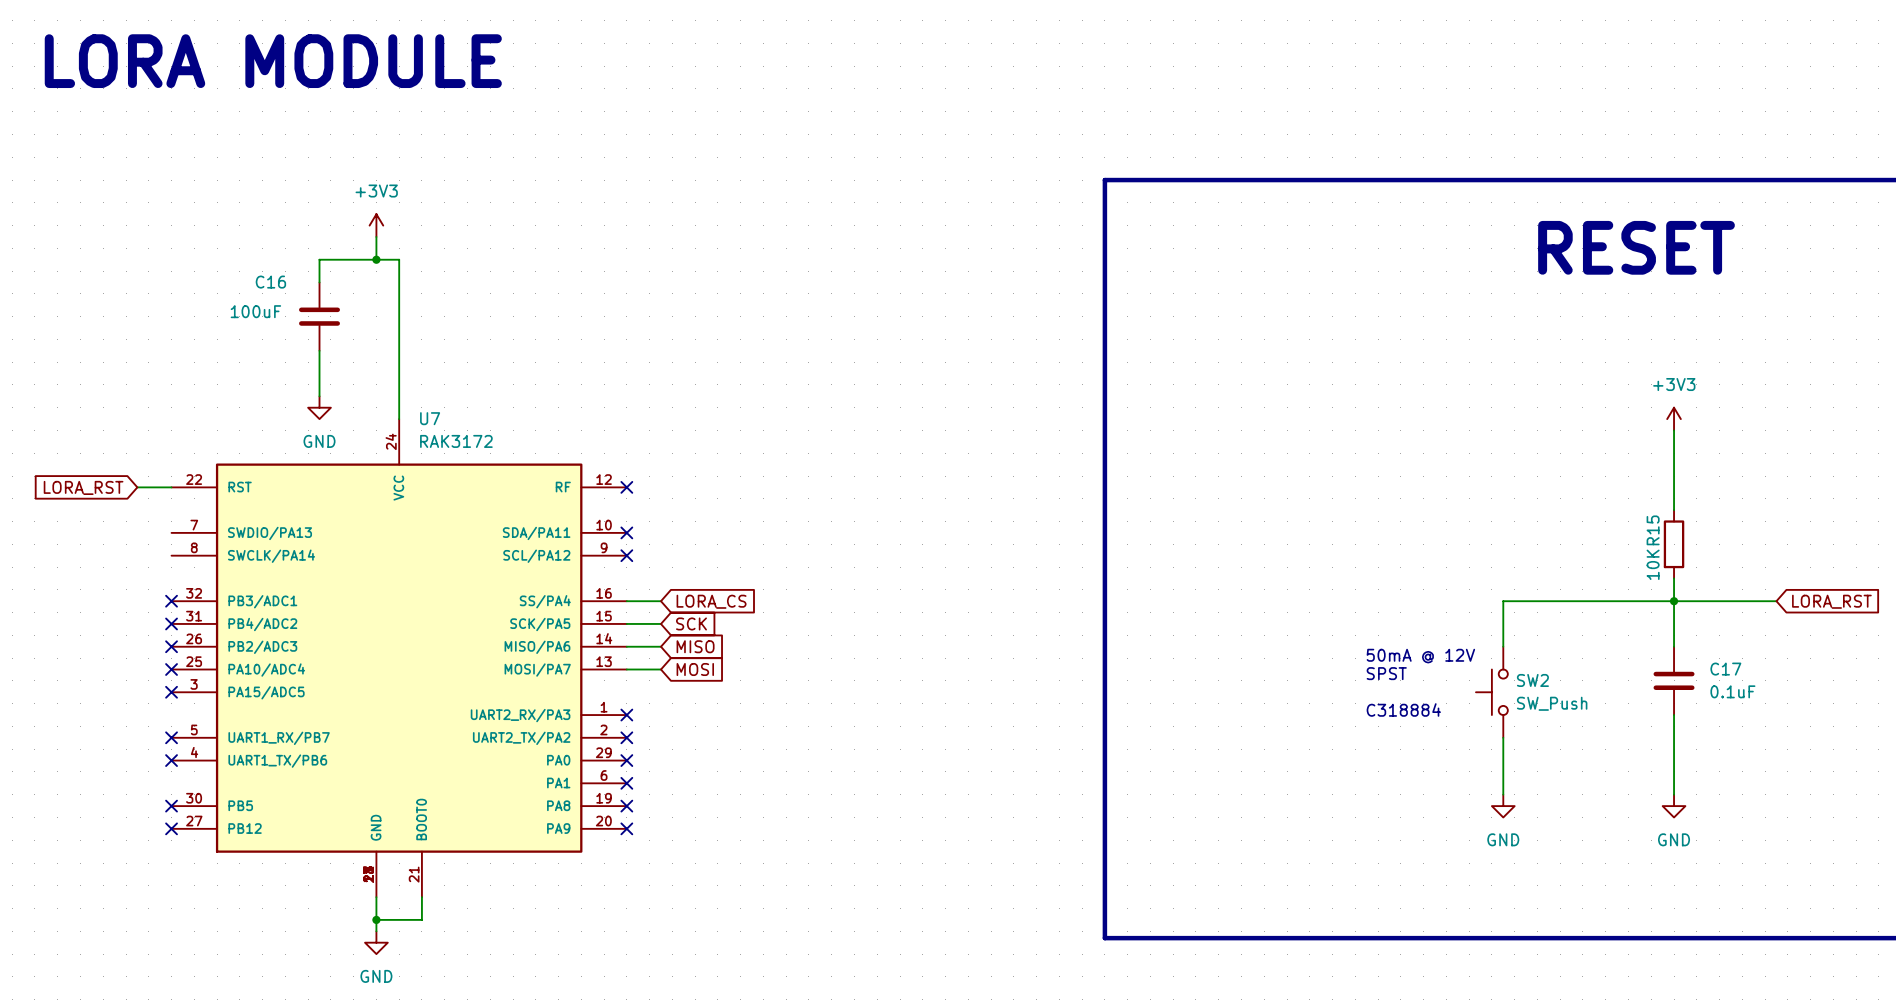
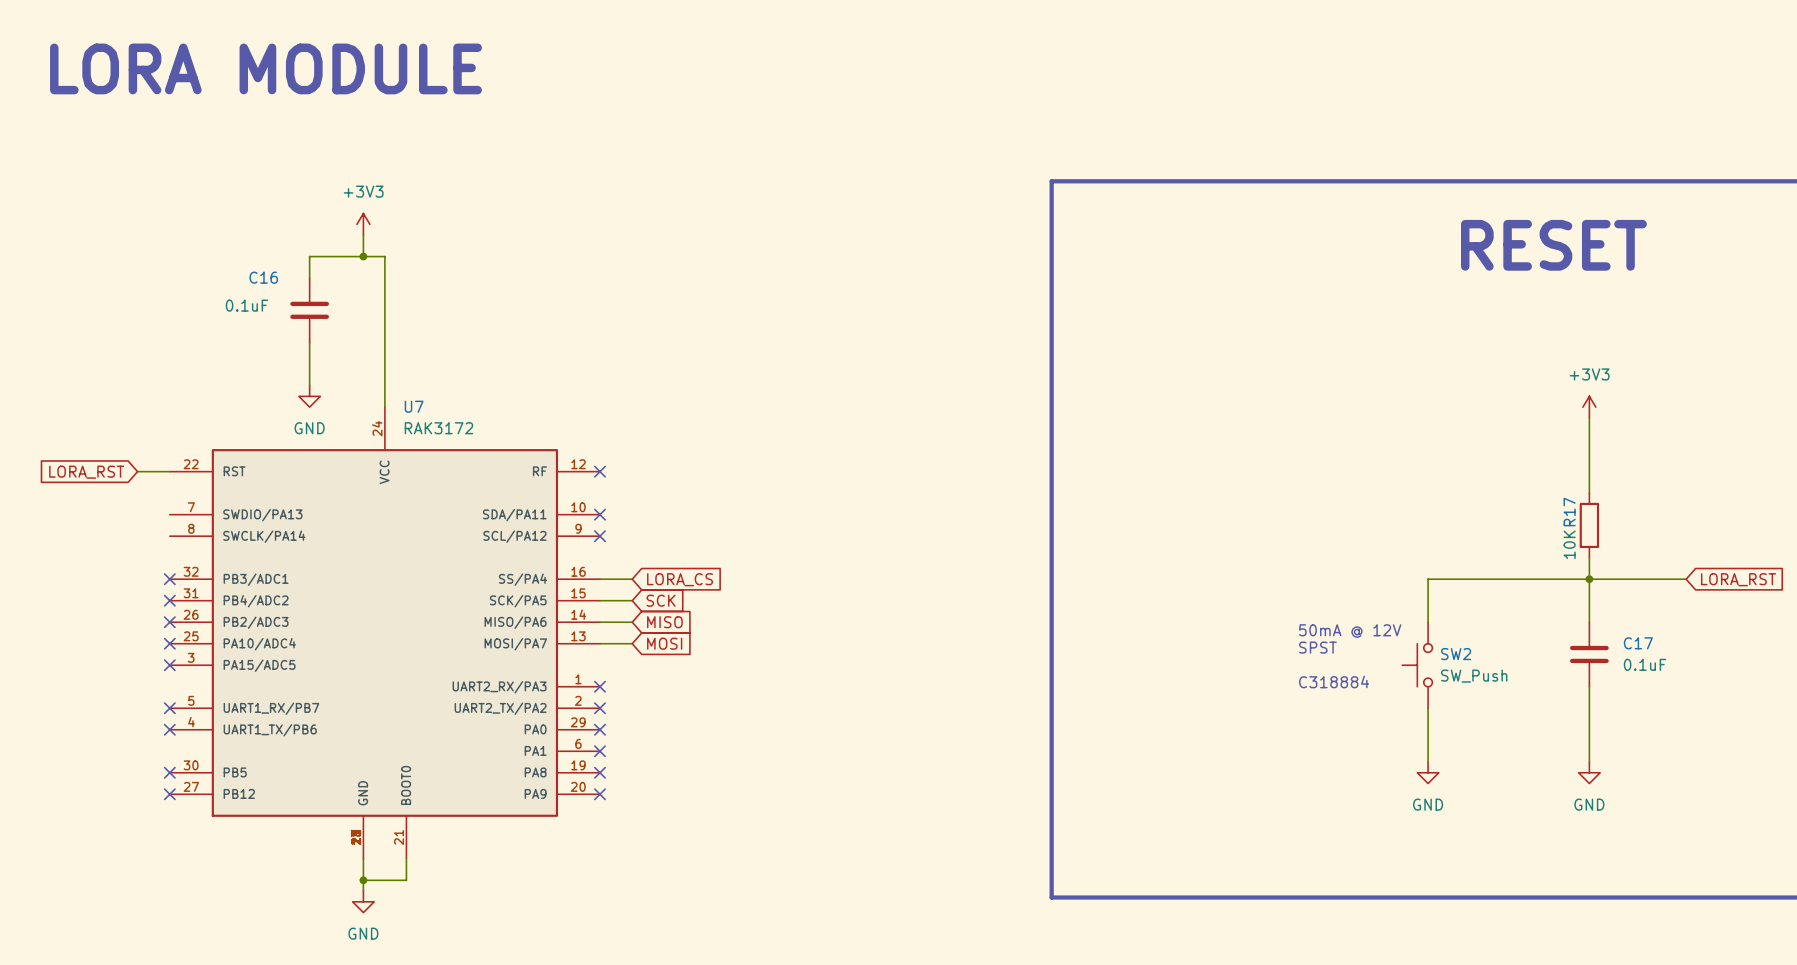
C16 value: 100uF (255, 311) -> 0.1uF (246, 305)
R15 name: R15 (1653, 530) -> R17 (1569, 512)

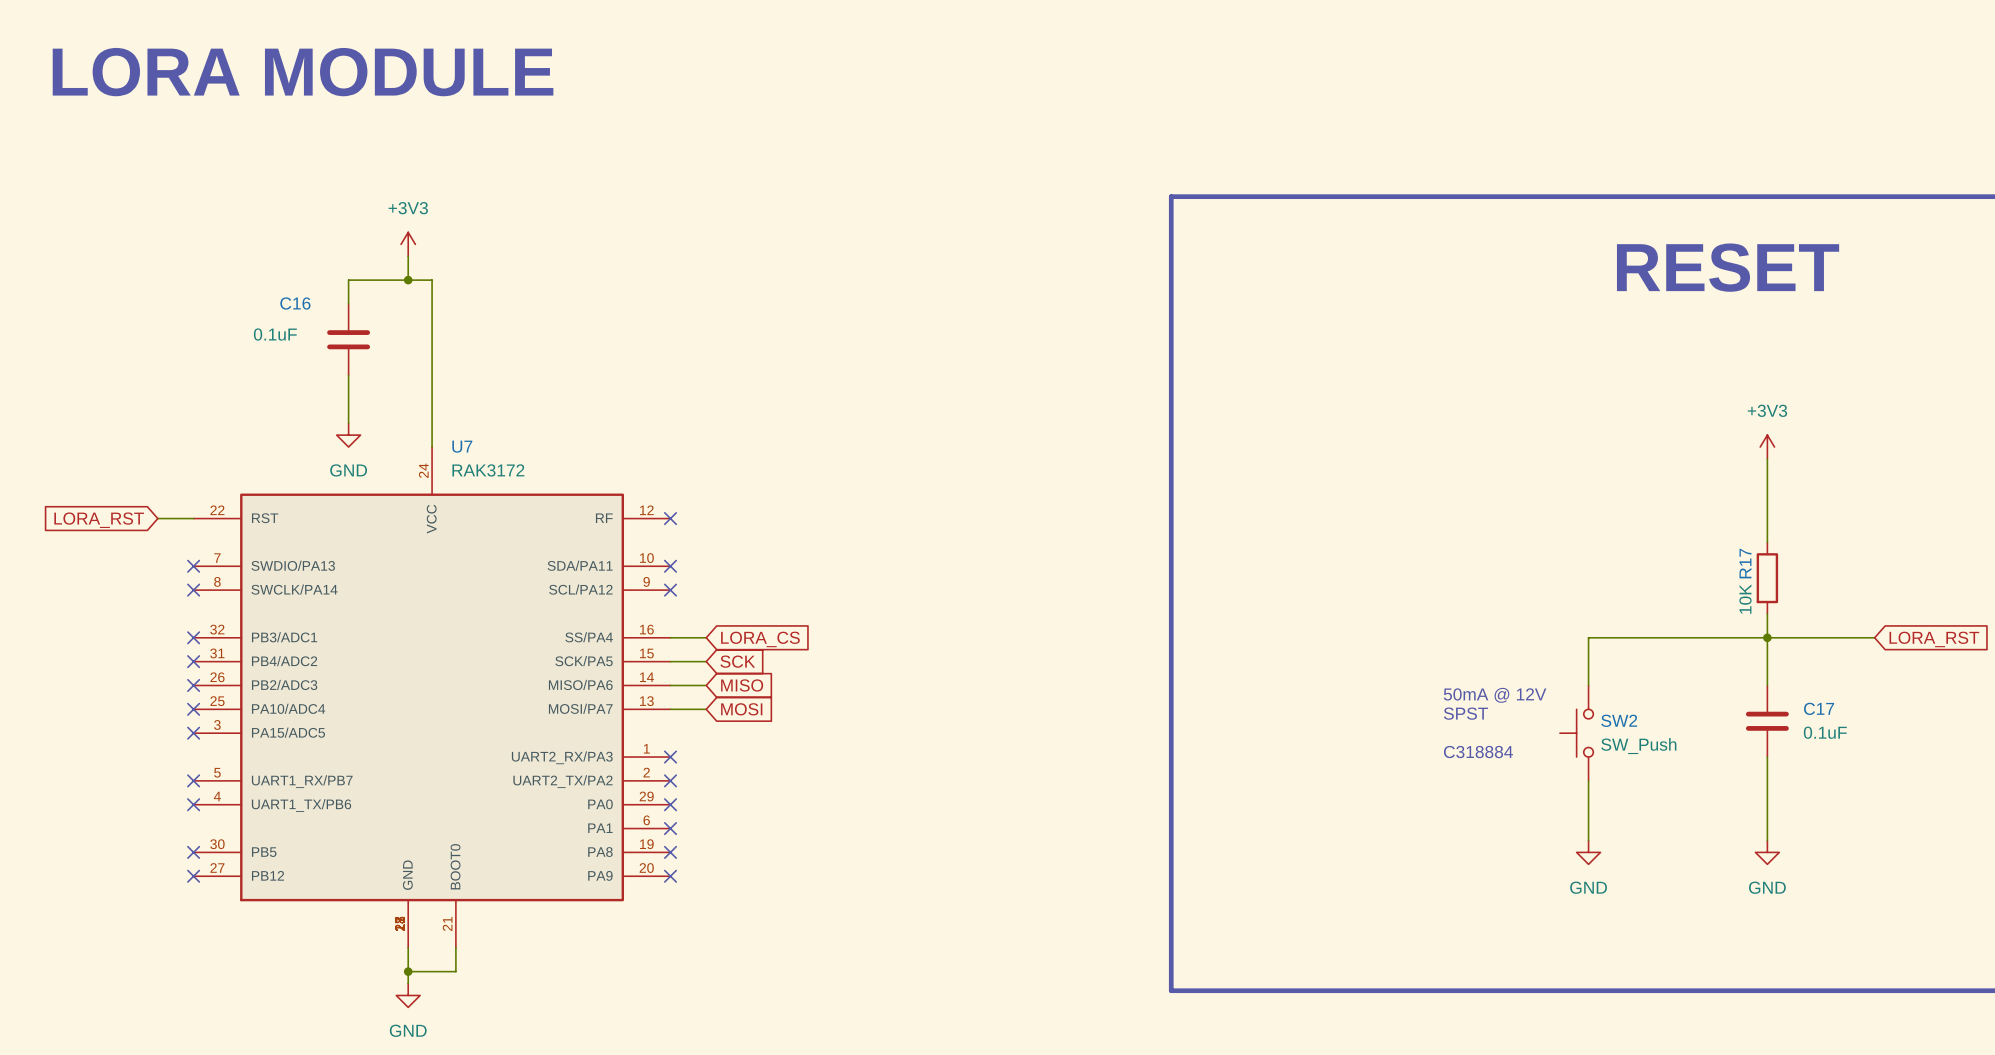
no-connect mark: none -> (193, 566)
no-connect mark: none -> (193, 590)

